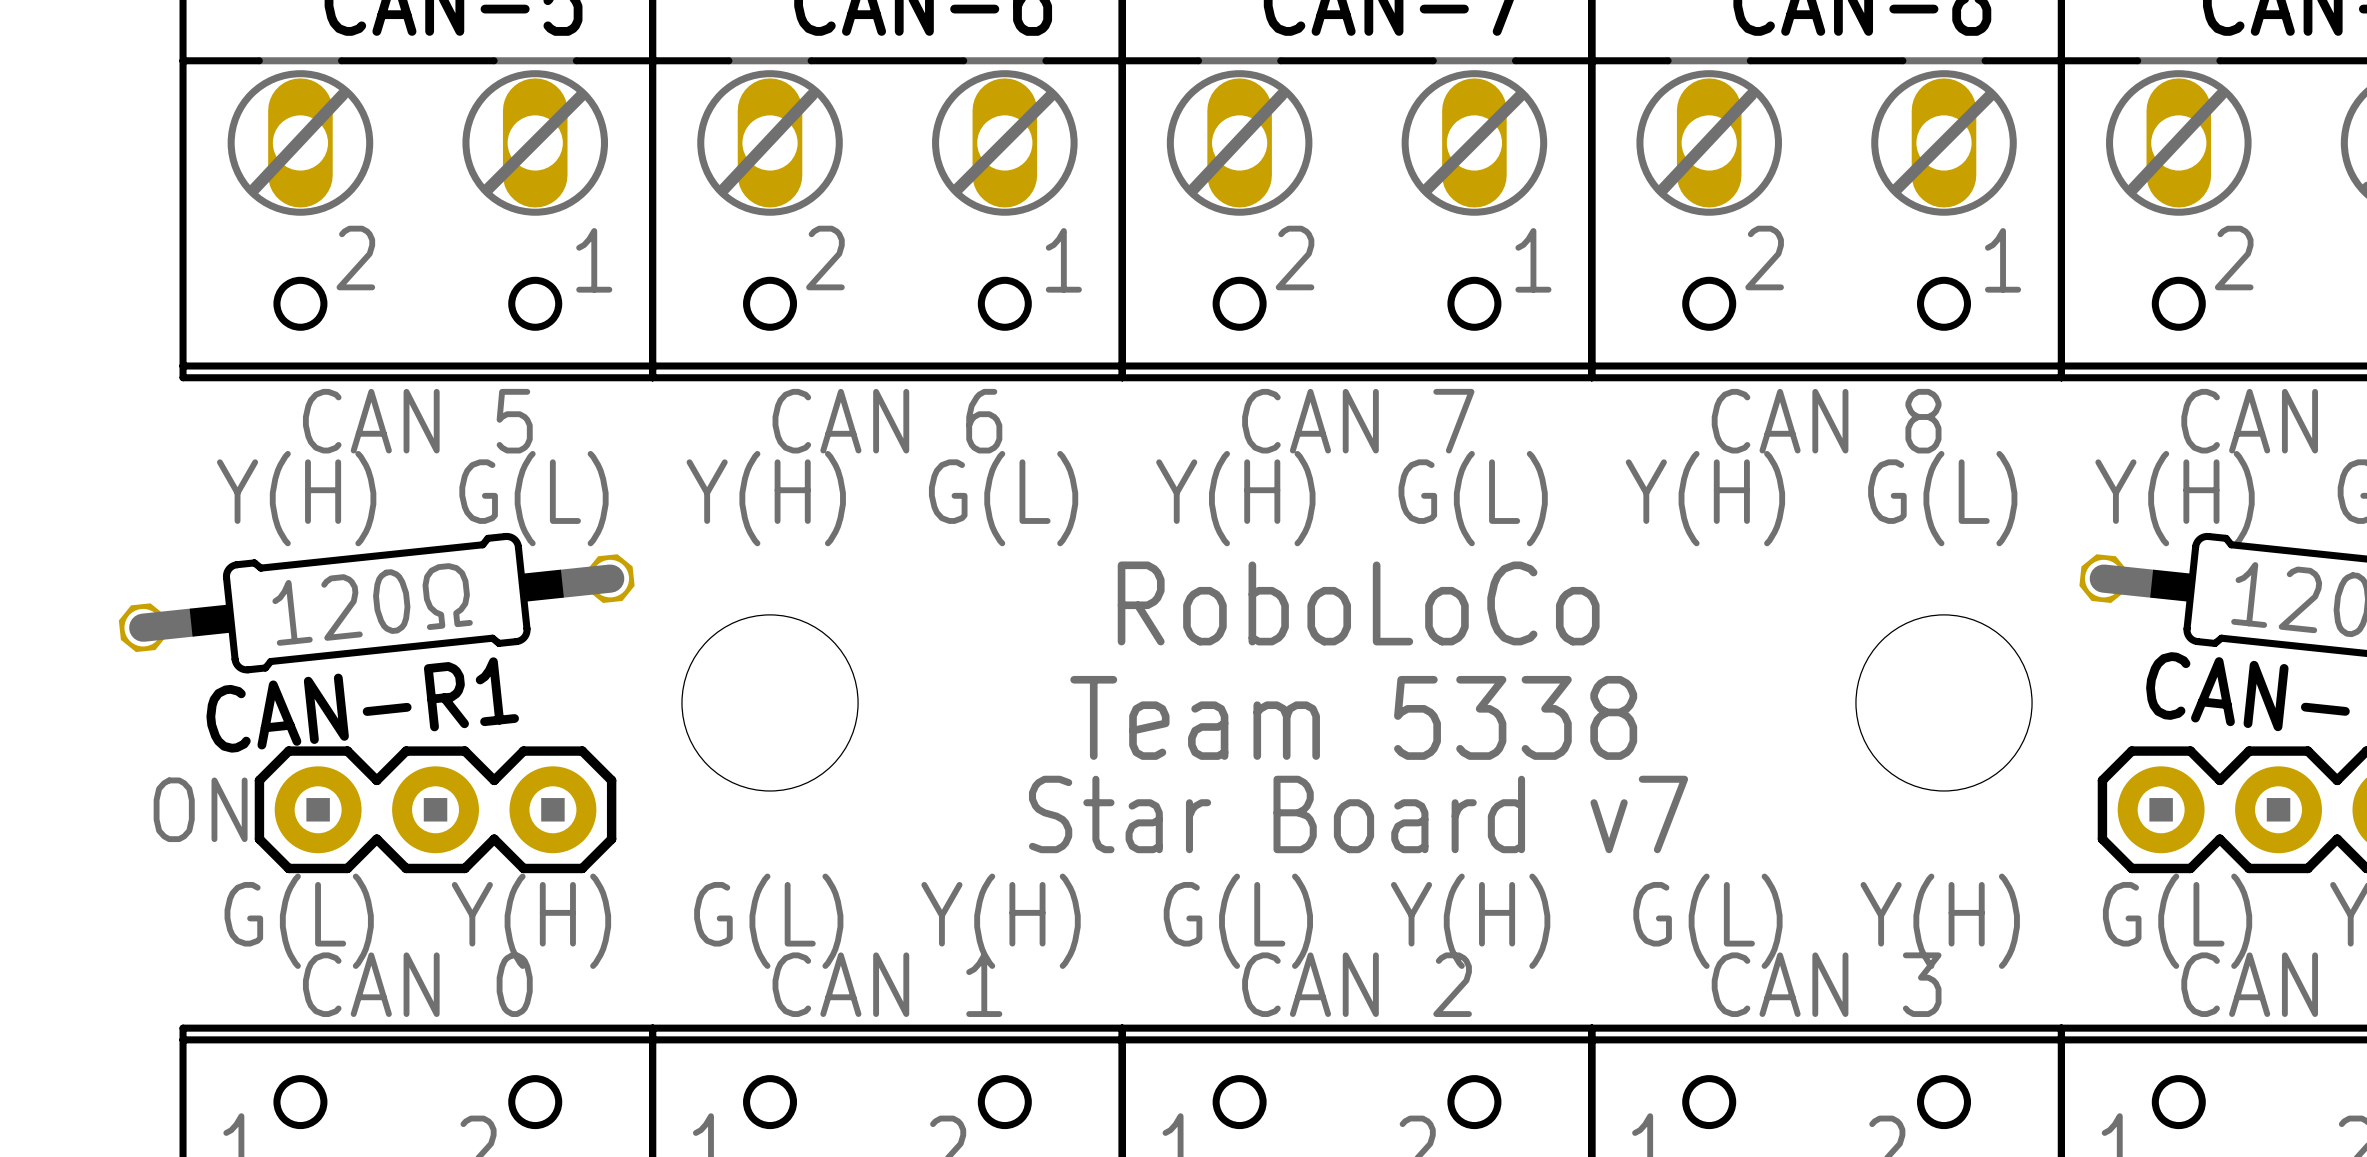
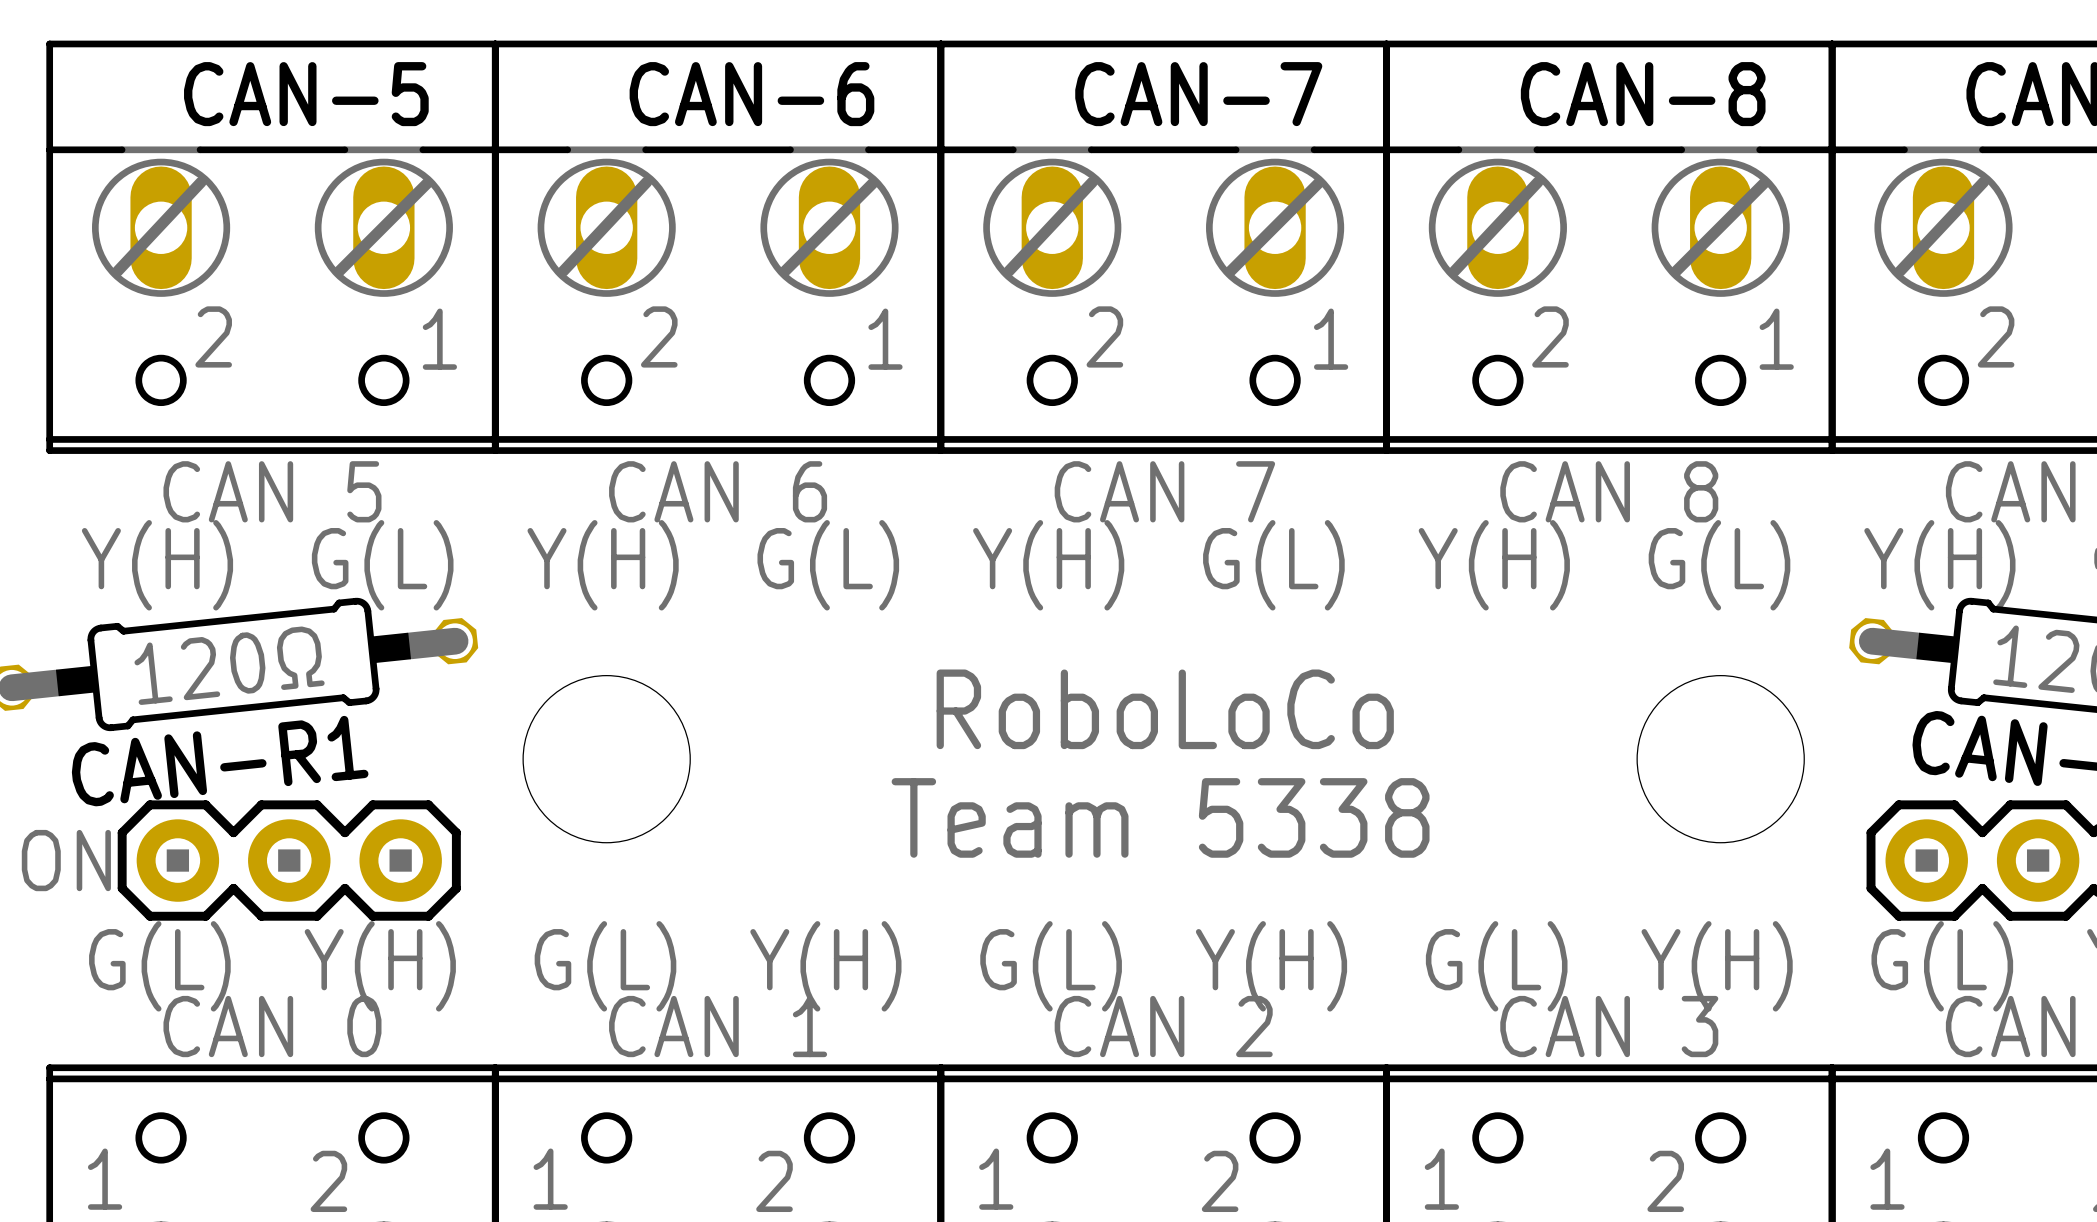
text position: RoboLoCo (1358, 603) -> RoboLoCo (1165, 709)
text position: Team 5338 (1353, 717) -> Team 5338 (1160, 817)
text: Star Board v7 (1358, 814) -> none

